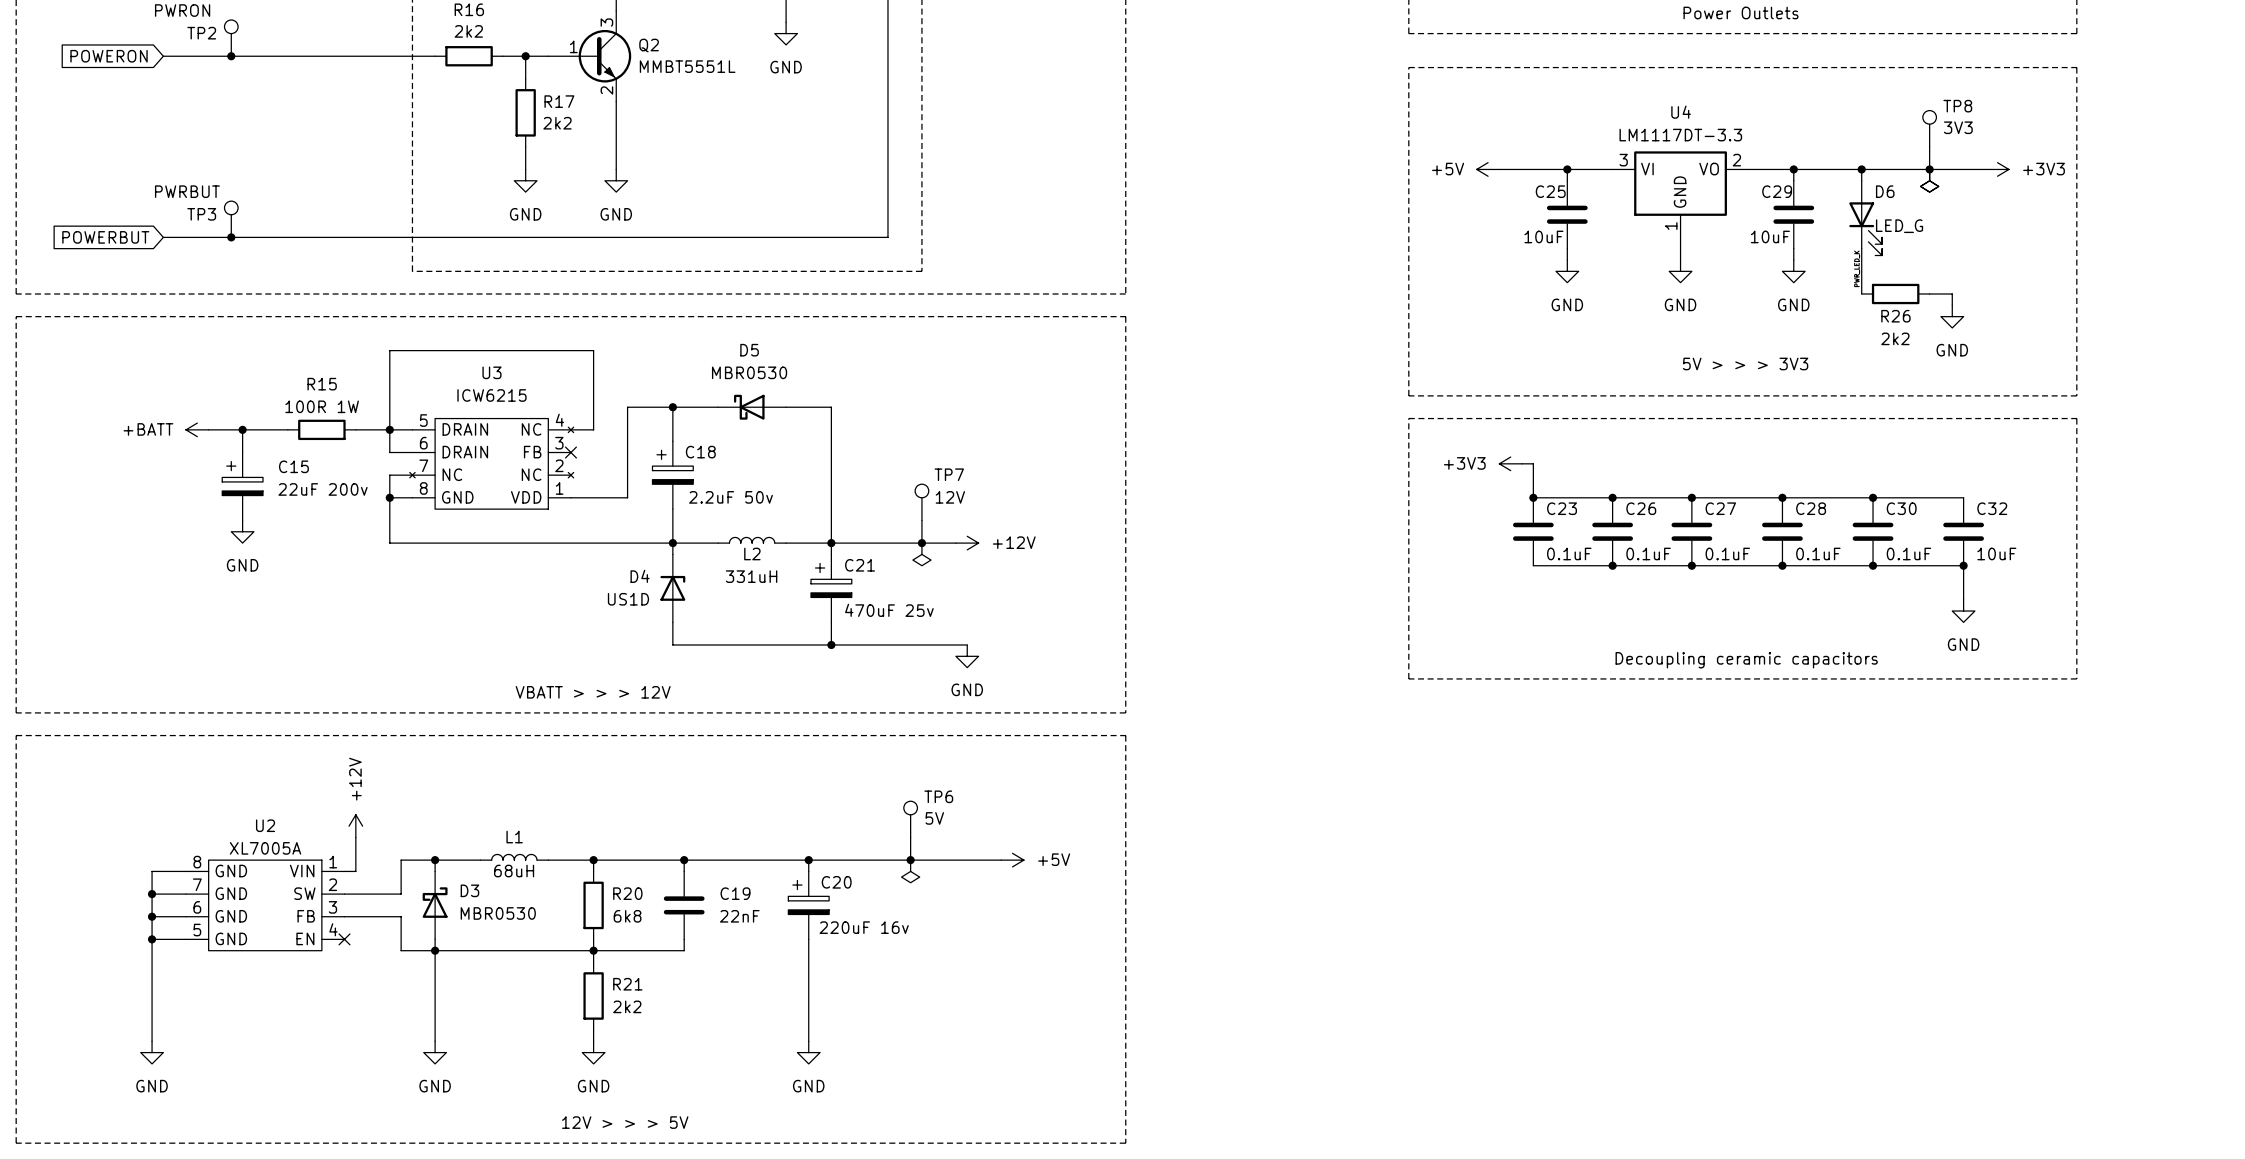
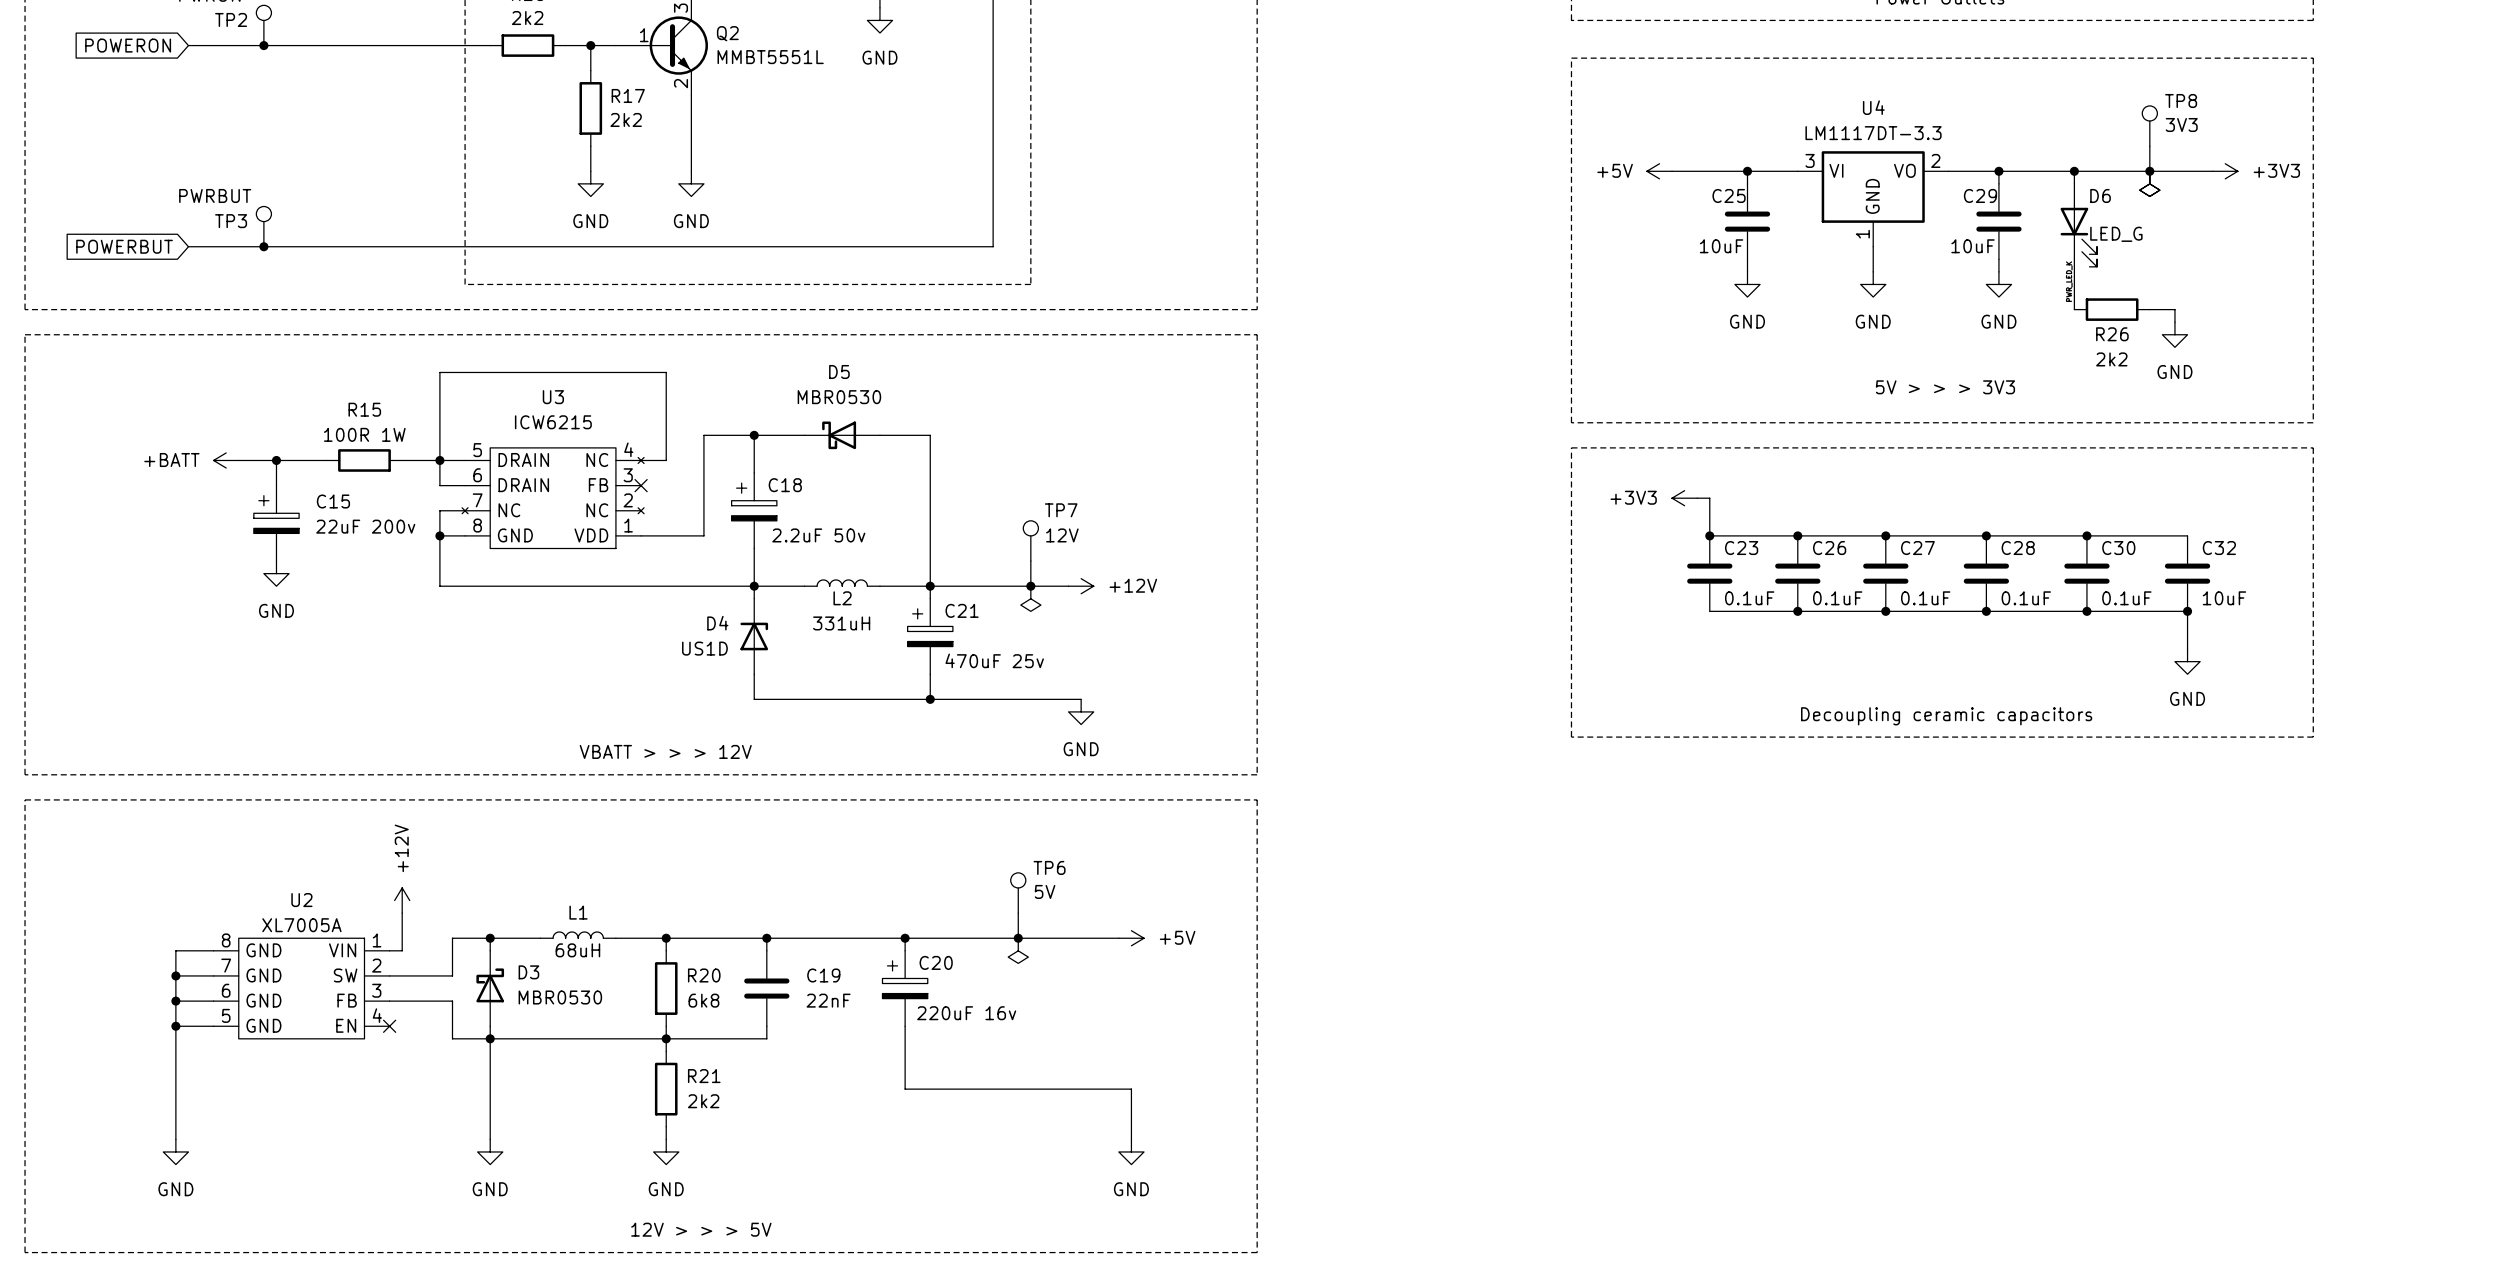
wire: (808, 995) (808, 1041) -> (905, 1089) (1131, 1089) (1131, 1139)
power symbol position: GND (808, 1052) -> GND (1131, 1151)

